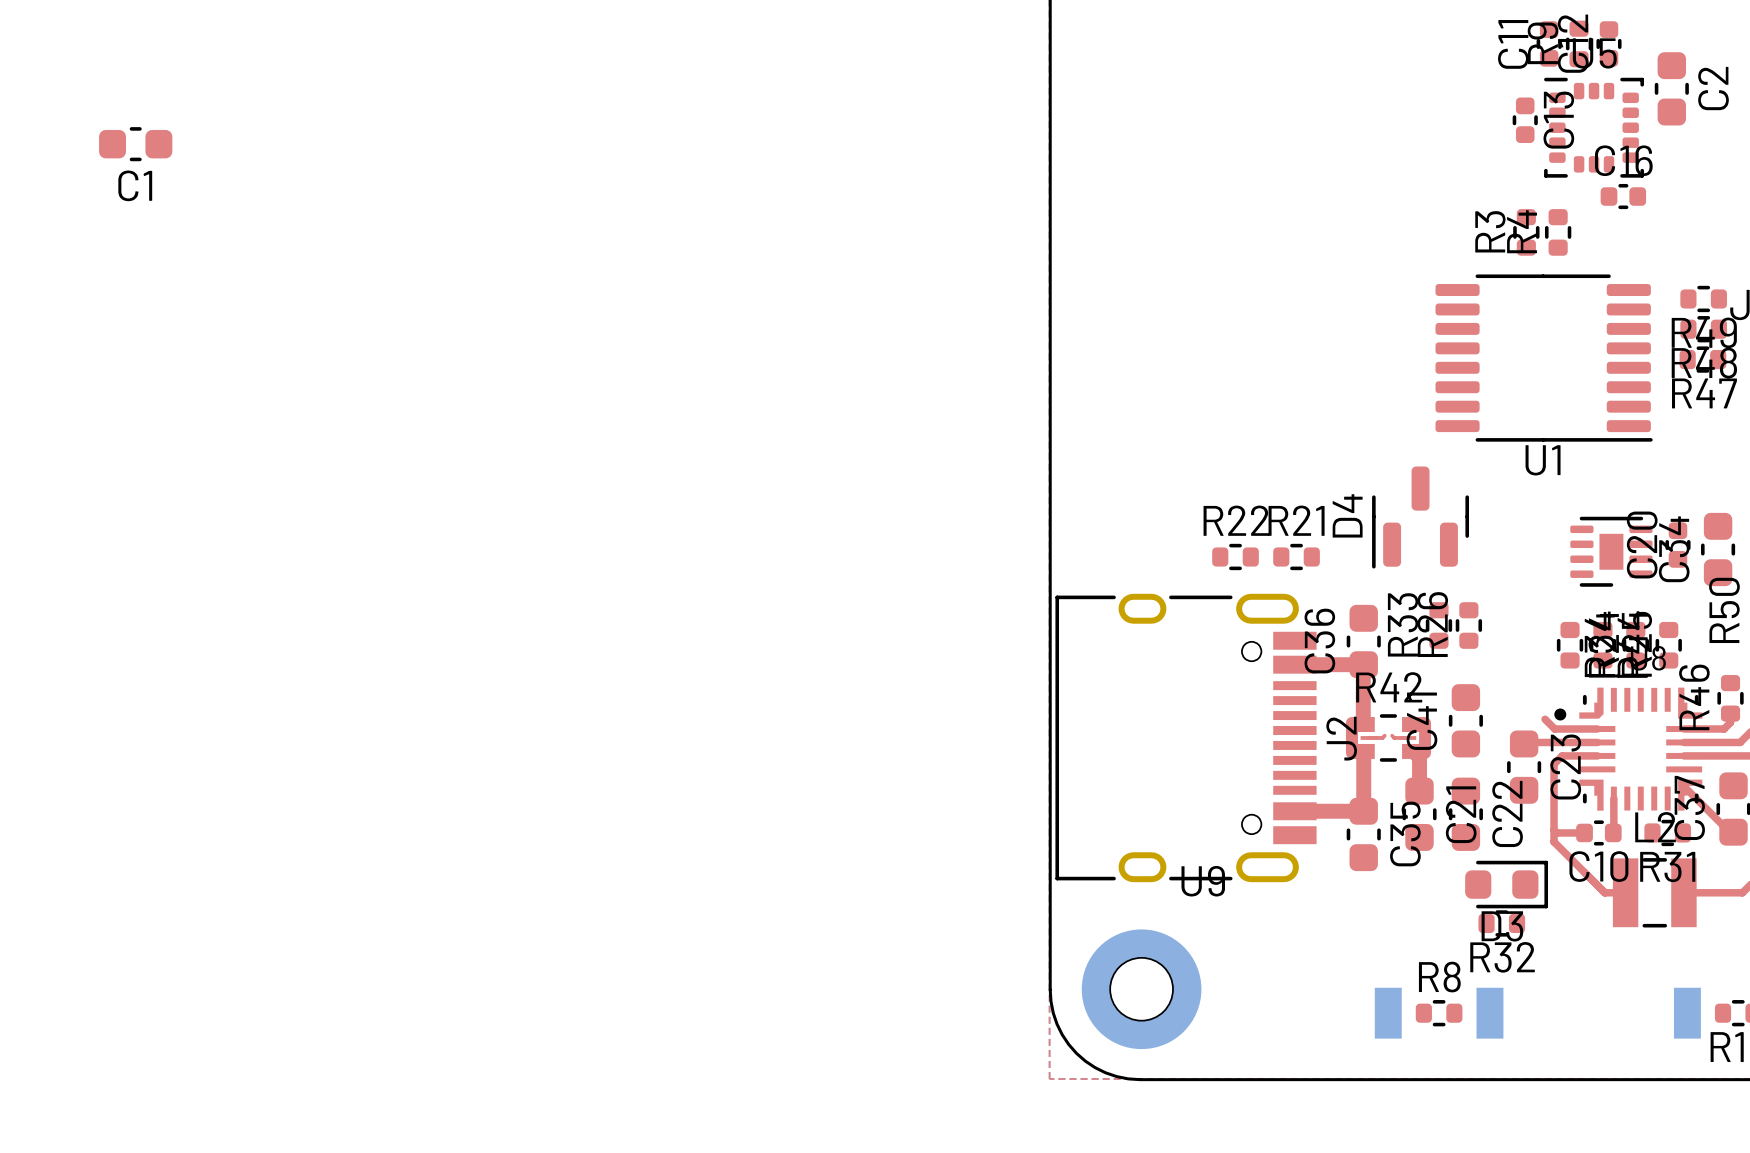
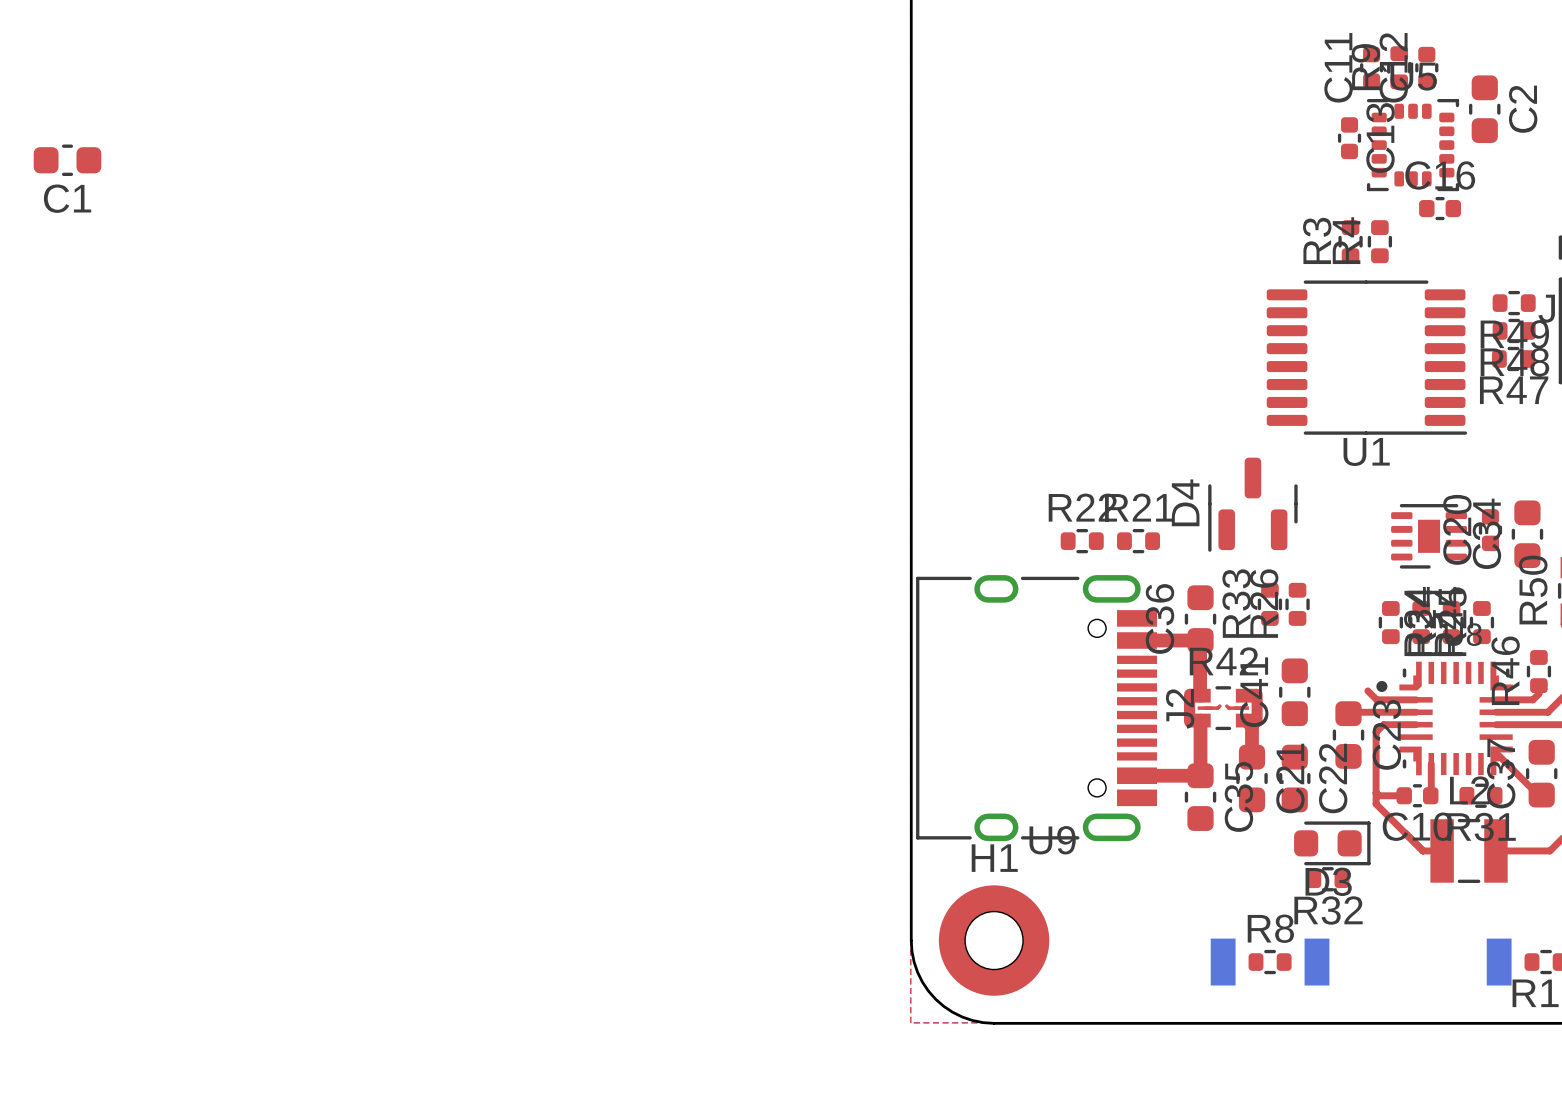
H1: none -> (994, 940)
part: (1141, 989) -> none

